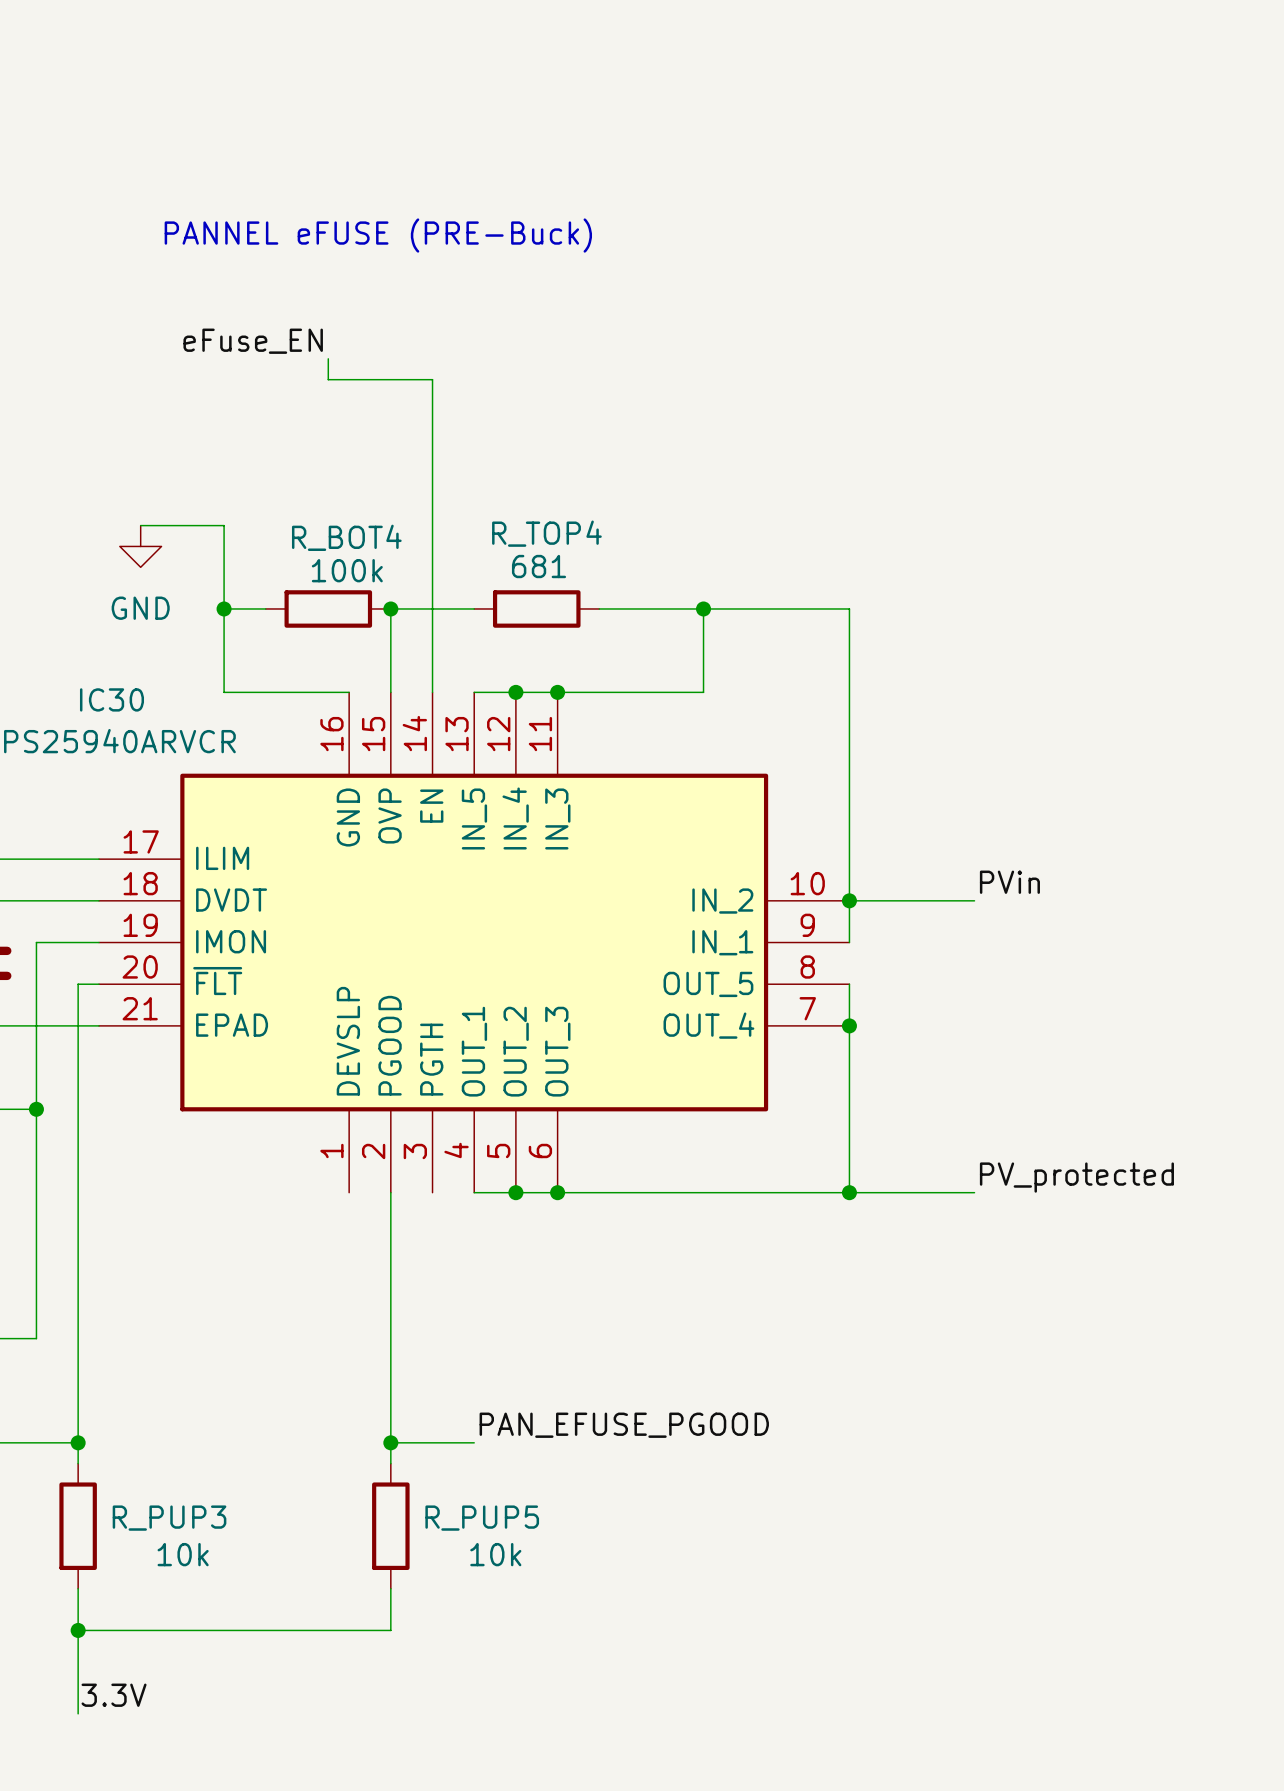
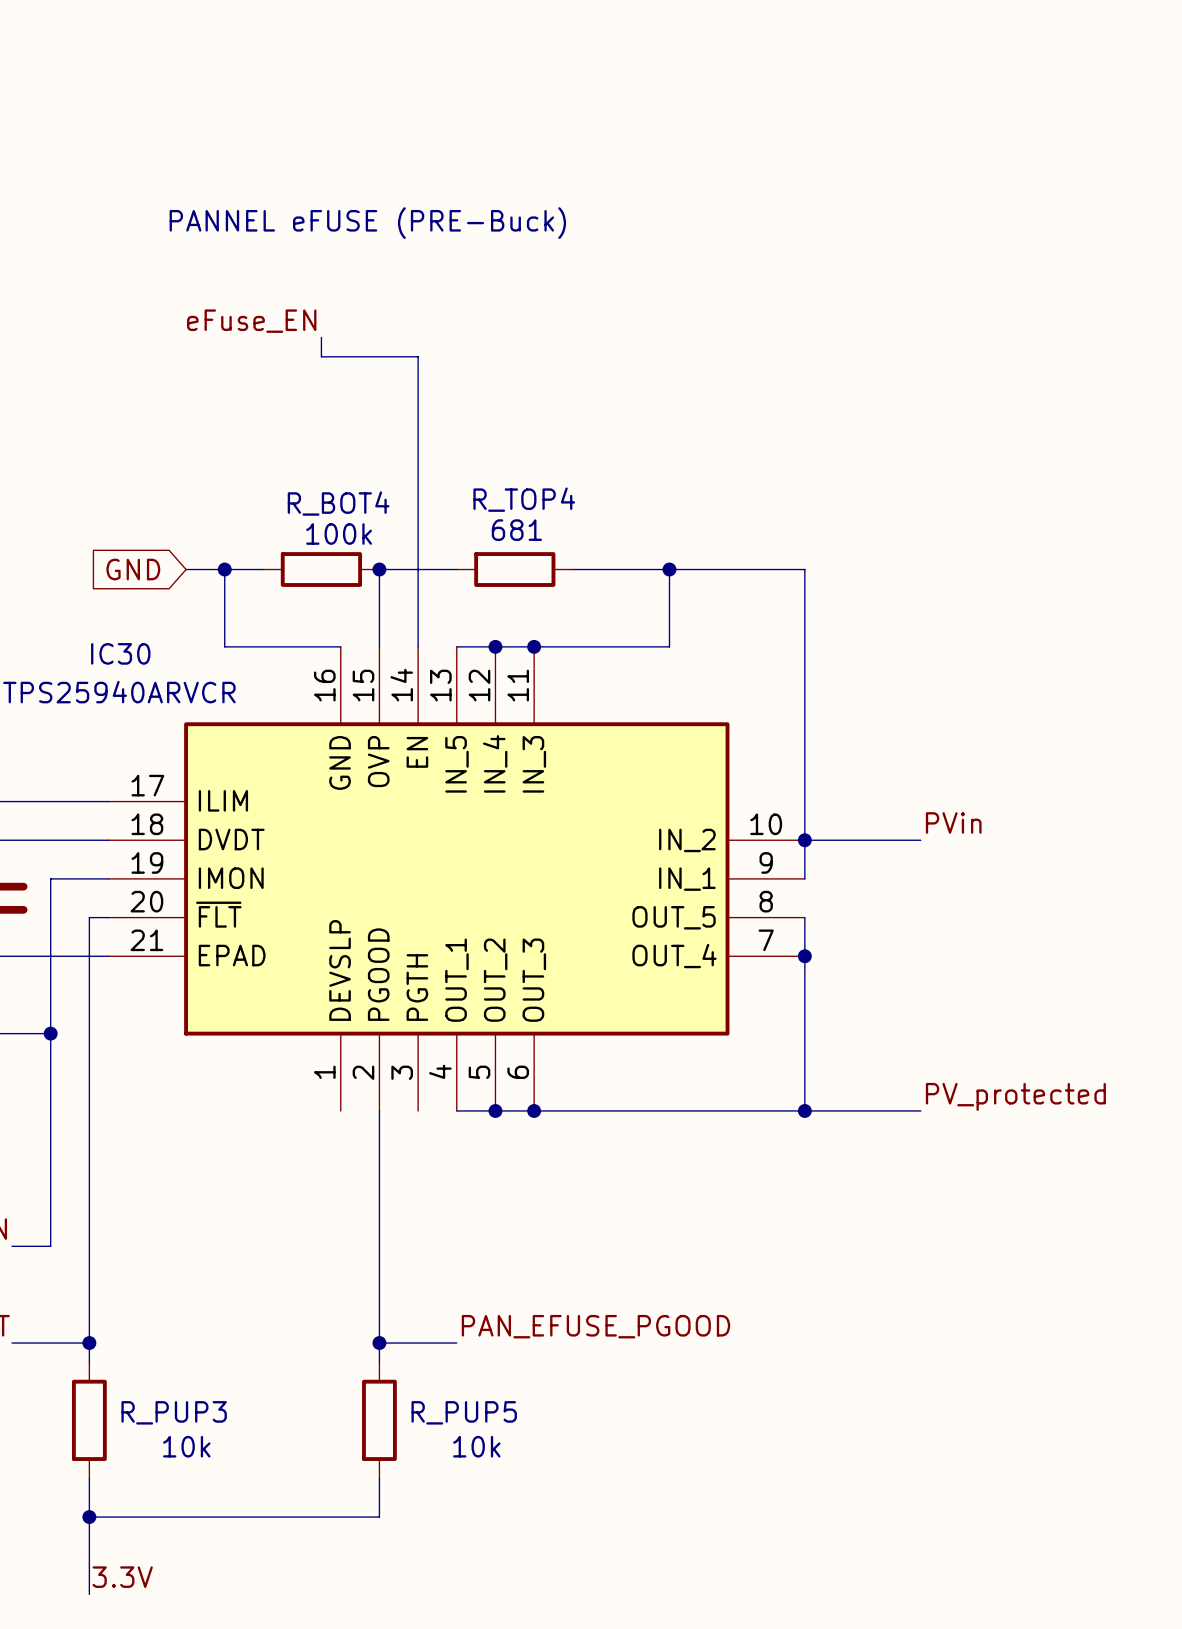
wire: (140, 525) (224, 525) (224, 608) -> (186, 569) (224, 569)
power symbol: GND (140, 546) -> none
global label: none -> GND (133, 569)

